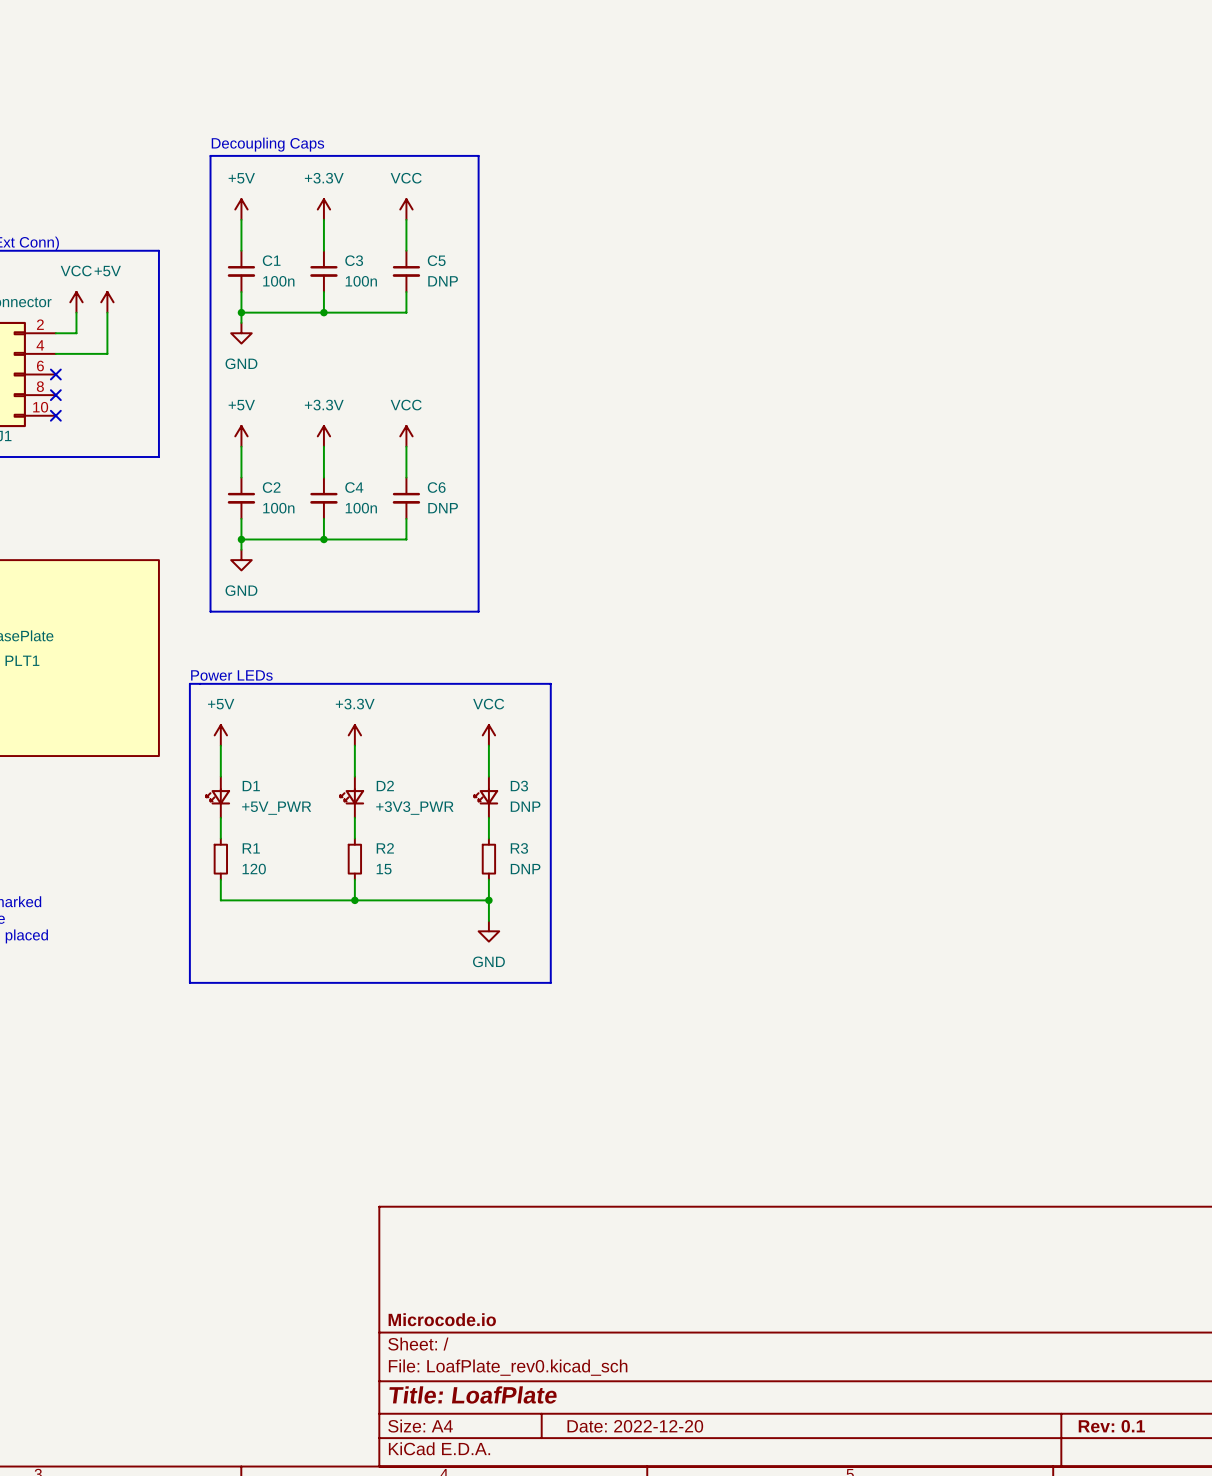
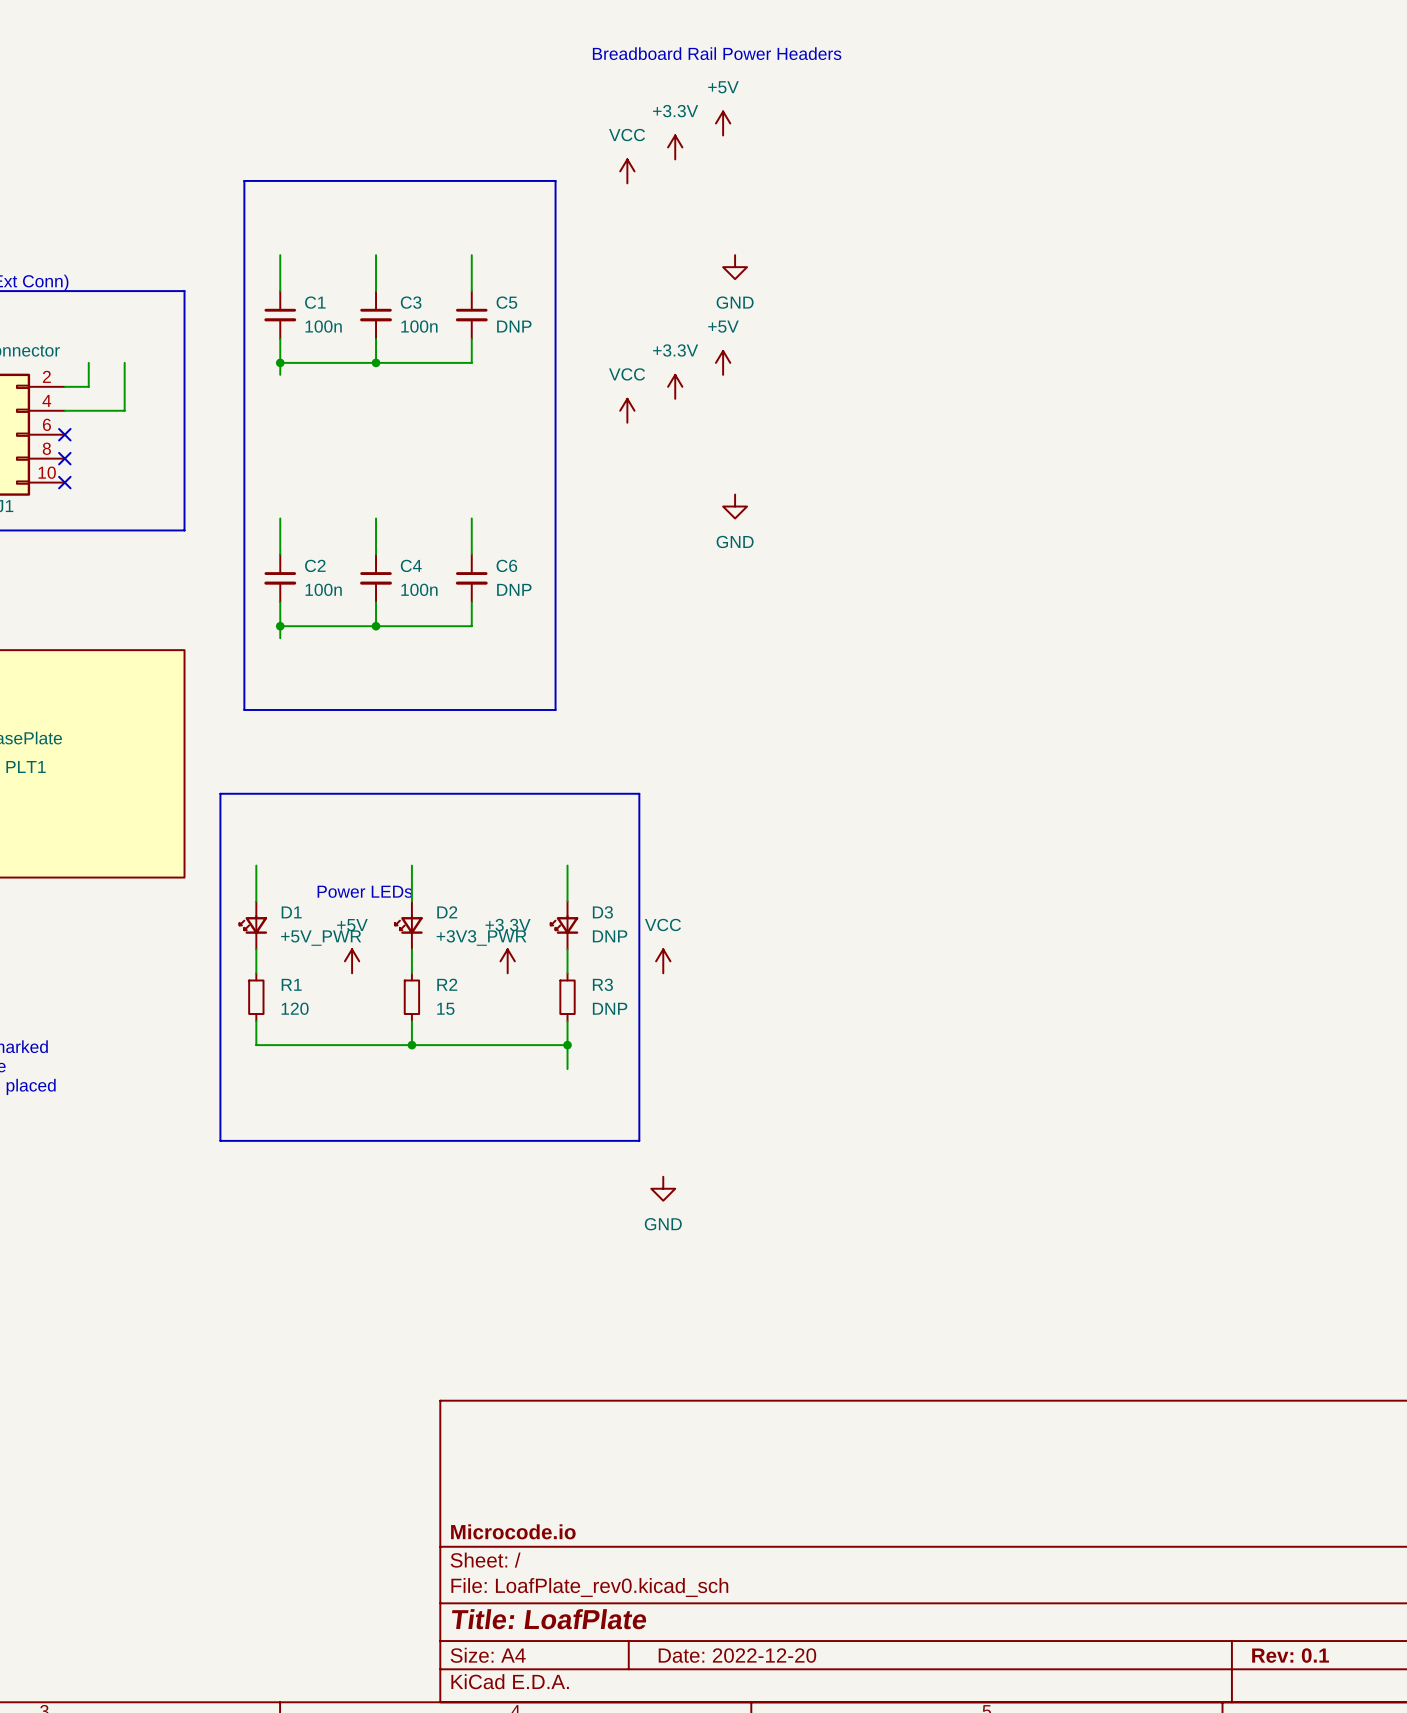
text: none -> Breadboard Rail Power Headers (717, 53)
power symbol: none -> +5V (723, 123)
power symbol: none -> +3.3V (675, 147)
text: Decoupling Caps (267, 144) -> none
power symbol: none -> VCC (627, 171)
power symbol: +5V (241, 209) -> none
power symbol: +3.3V (323, 209) -> none
power symbol: VCC (406, 209) -> none
power symbol: none -> GND (735, 267)
power symbol: VCC (76, 302) -> none
power symbol: +5V (107, 302) -> none
power symbol: none -> +5V (723, 362)
power symbol: GND (241, 333) -> none
power symbol: none -> +3.3V (675, 386)
power symbol: none -> VCC (627, 410)
power symbol: +5V (241, 436) -> none
power symbol: +3.3V (323, 436) -> none
power symbol: VCC (406, 436) -> none
power symbol: none -> GND (735, 506)
power symbol: GND (241, 560) -> none
text position: Power LEDs (231, 675) -> Power LEDs (364, 891)
power symbol position: +5V (220, 735) -> +5V (352, 961)
power symbol position: +3.3V (354, 735) -> +3.3V (507, 961)
power symbol position: VCC (488, 735) -> VCC (663, 961)
power symbol position: GND (488, 931) -> GND (663, 1188)

